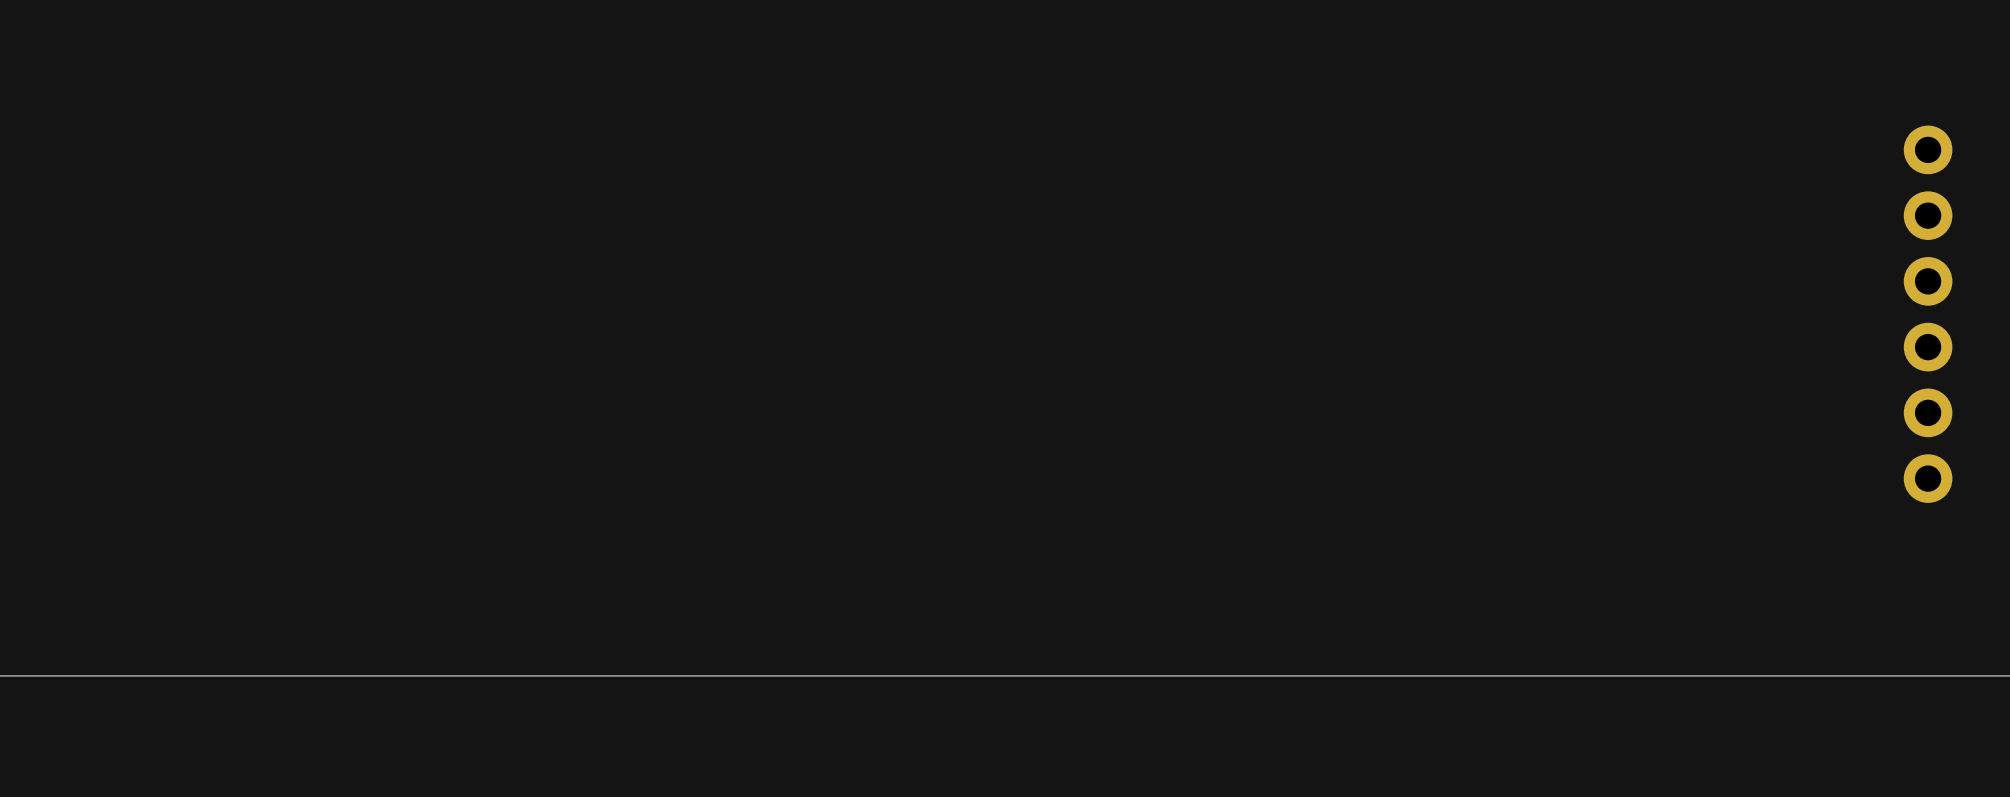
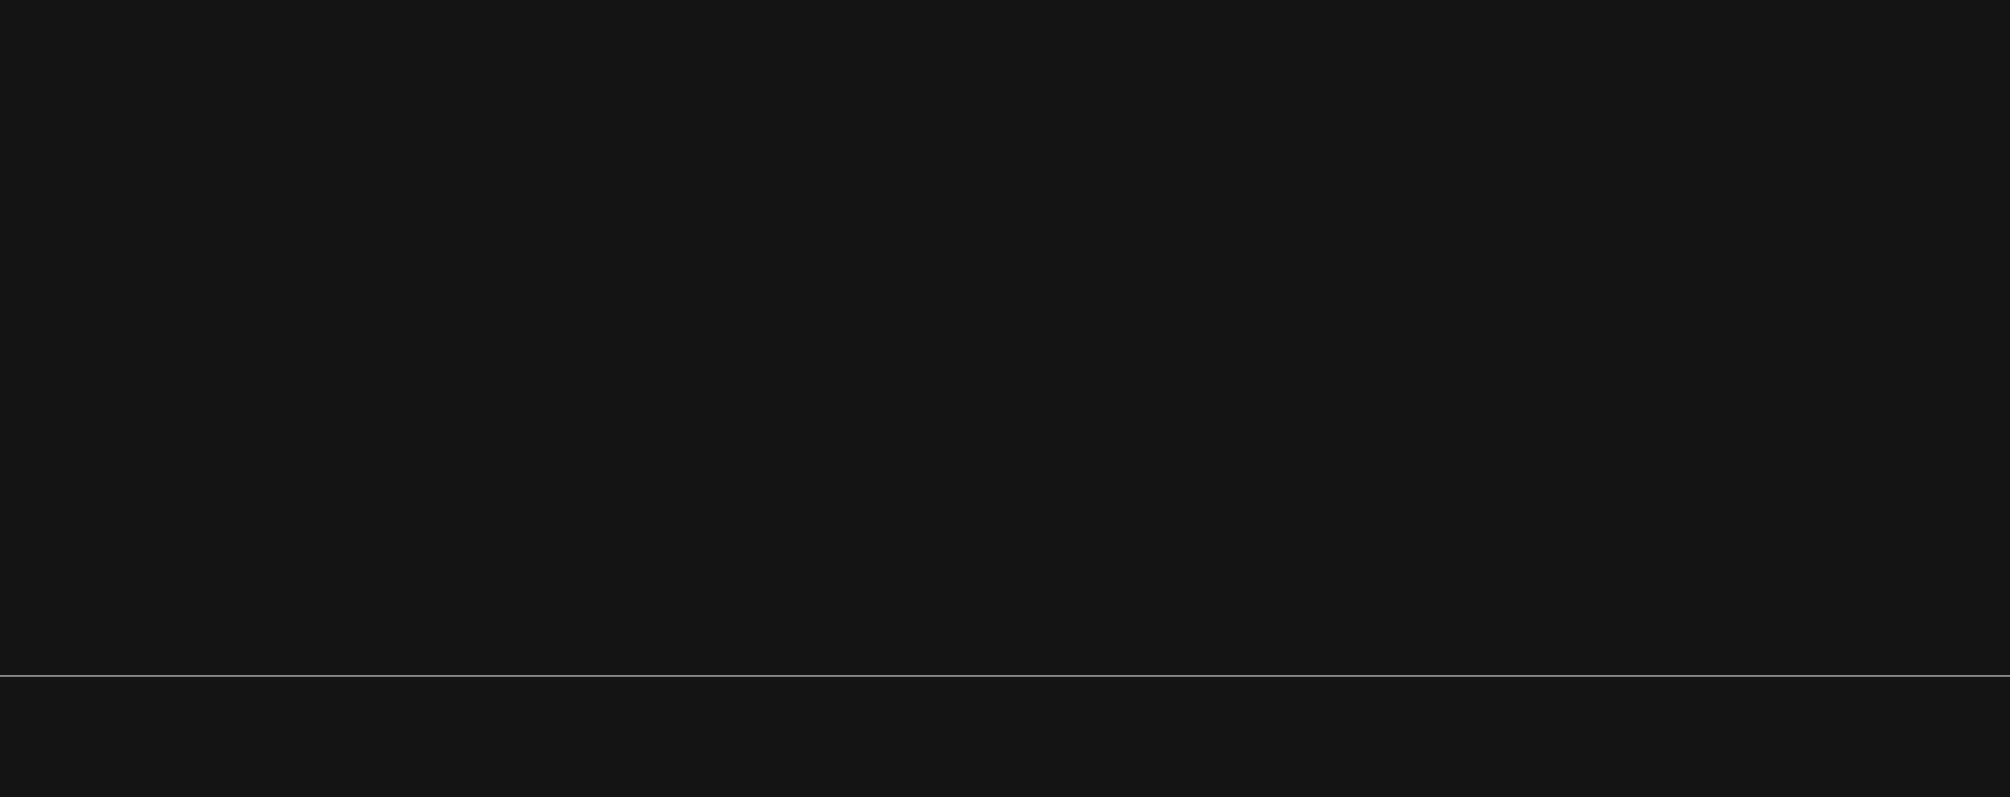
part: (1928, 314) -> none

